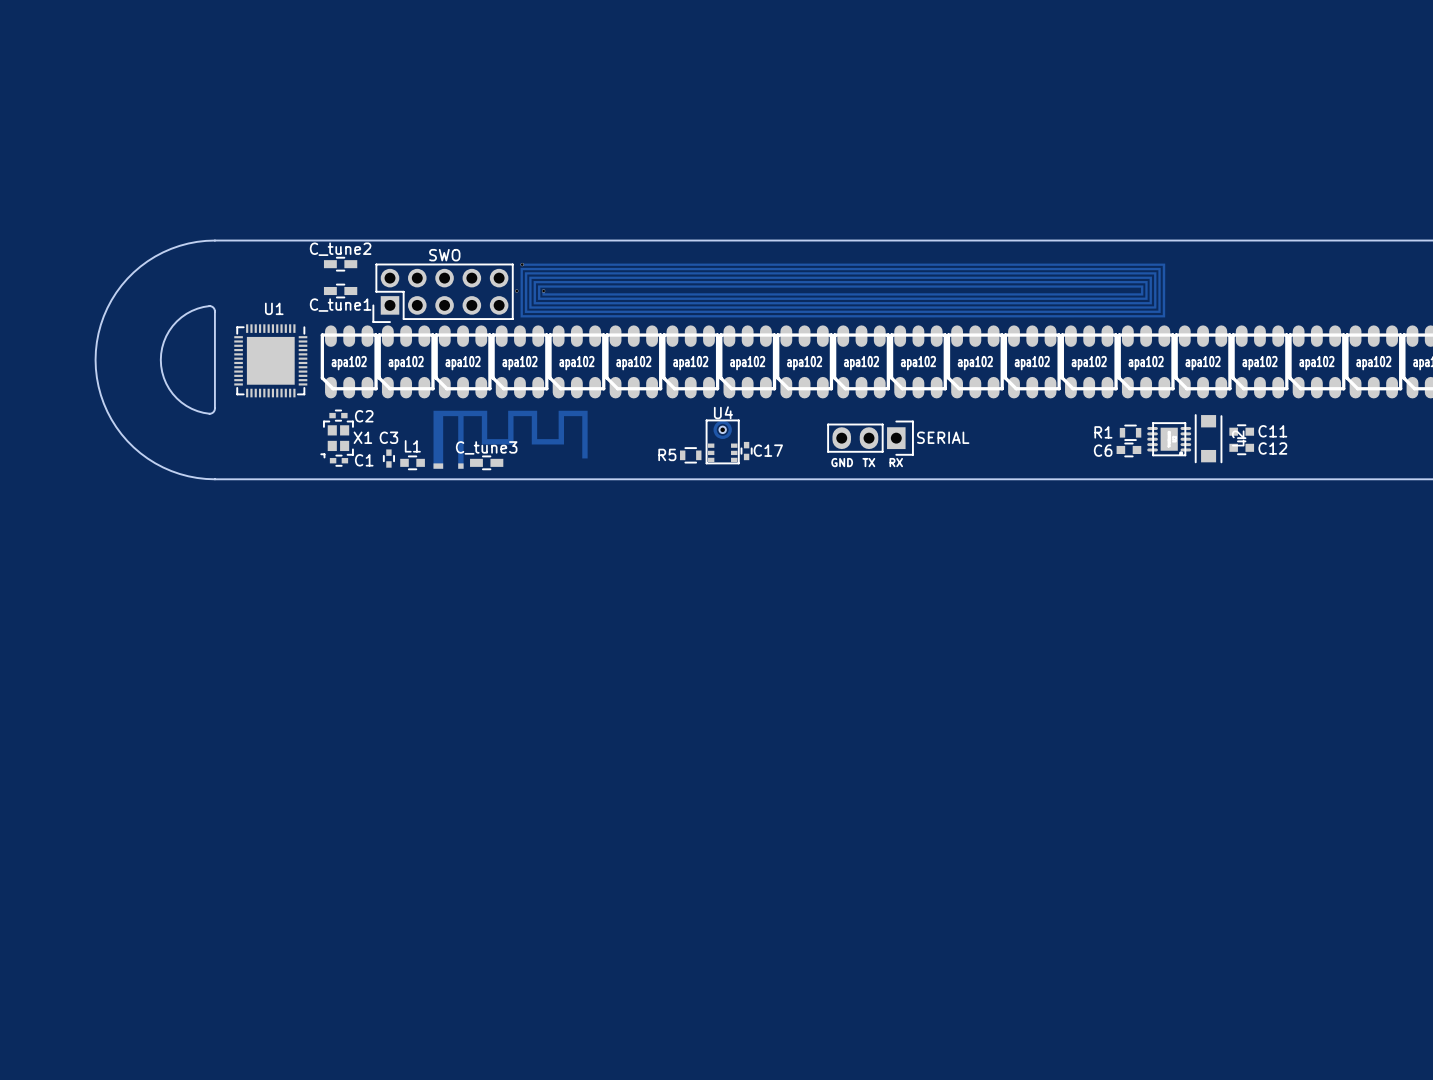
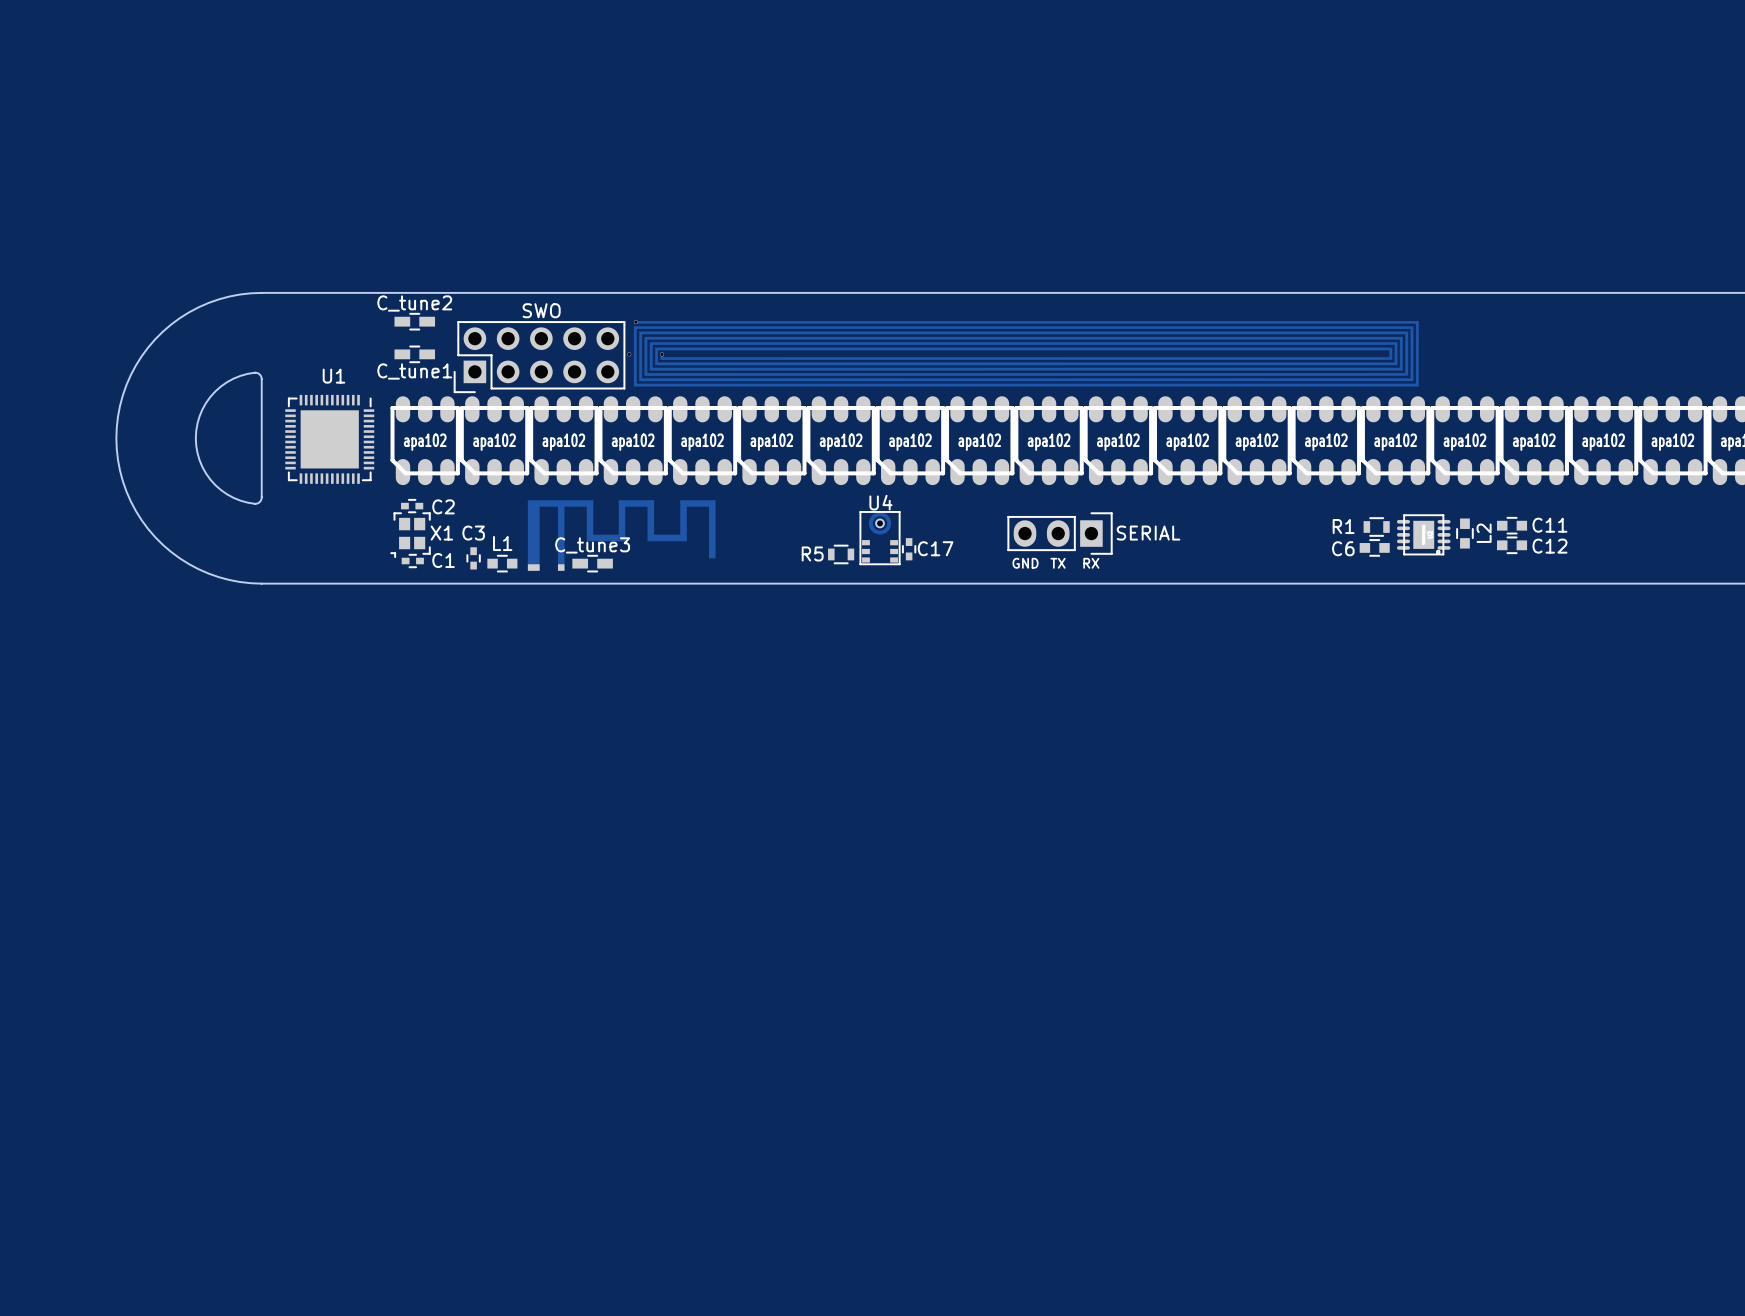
L2 footprint: [1194, 414, 1223, 464] -> [1456, 518, 1474, 549]

